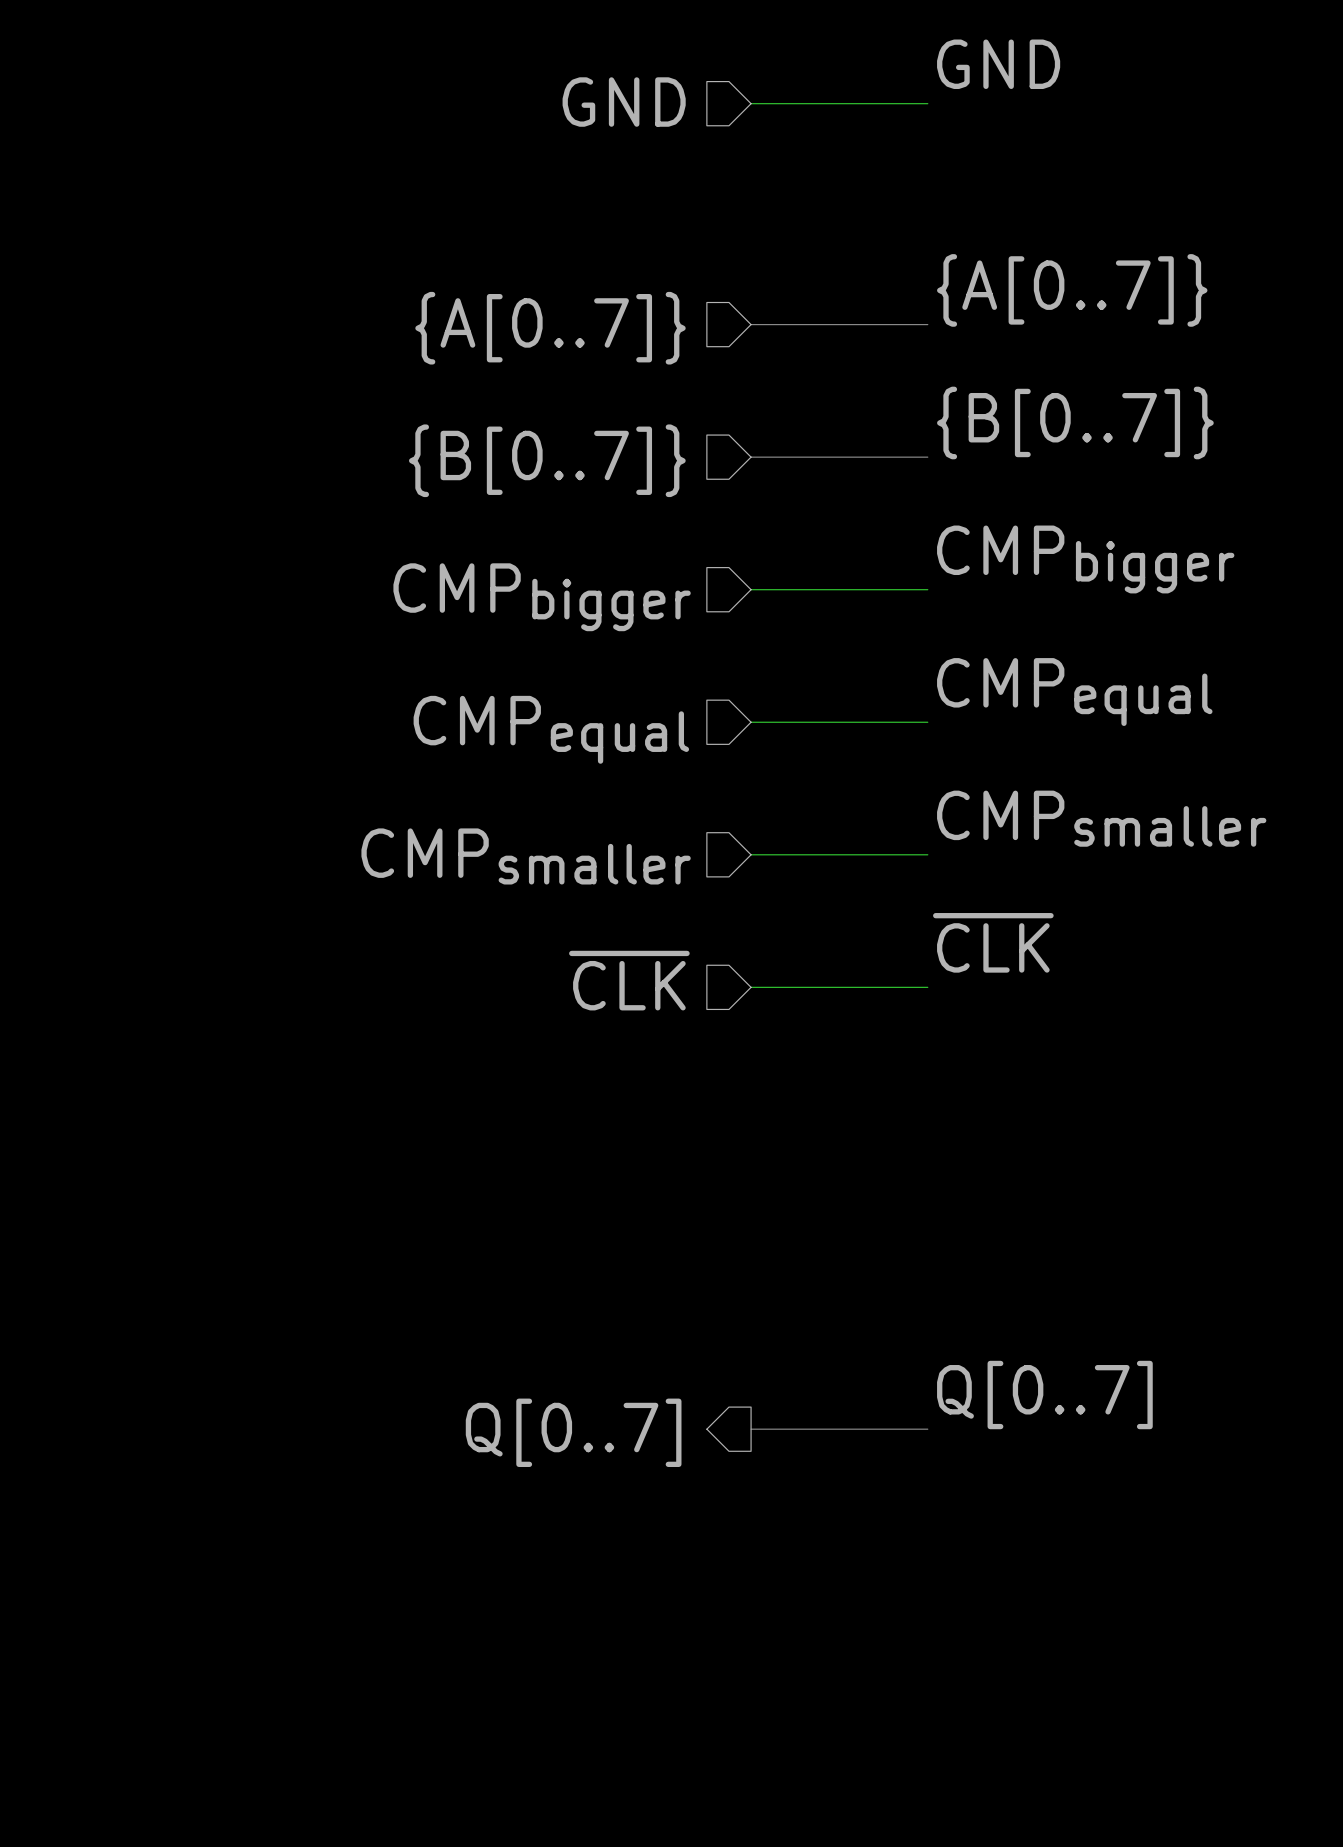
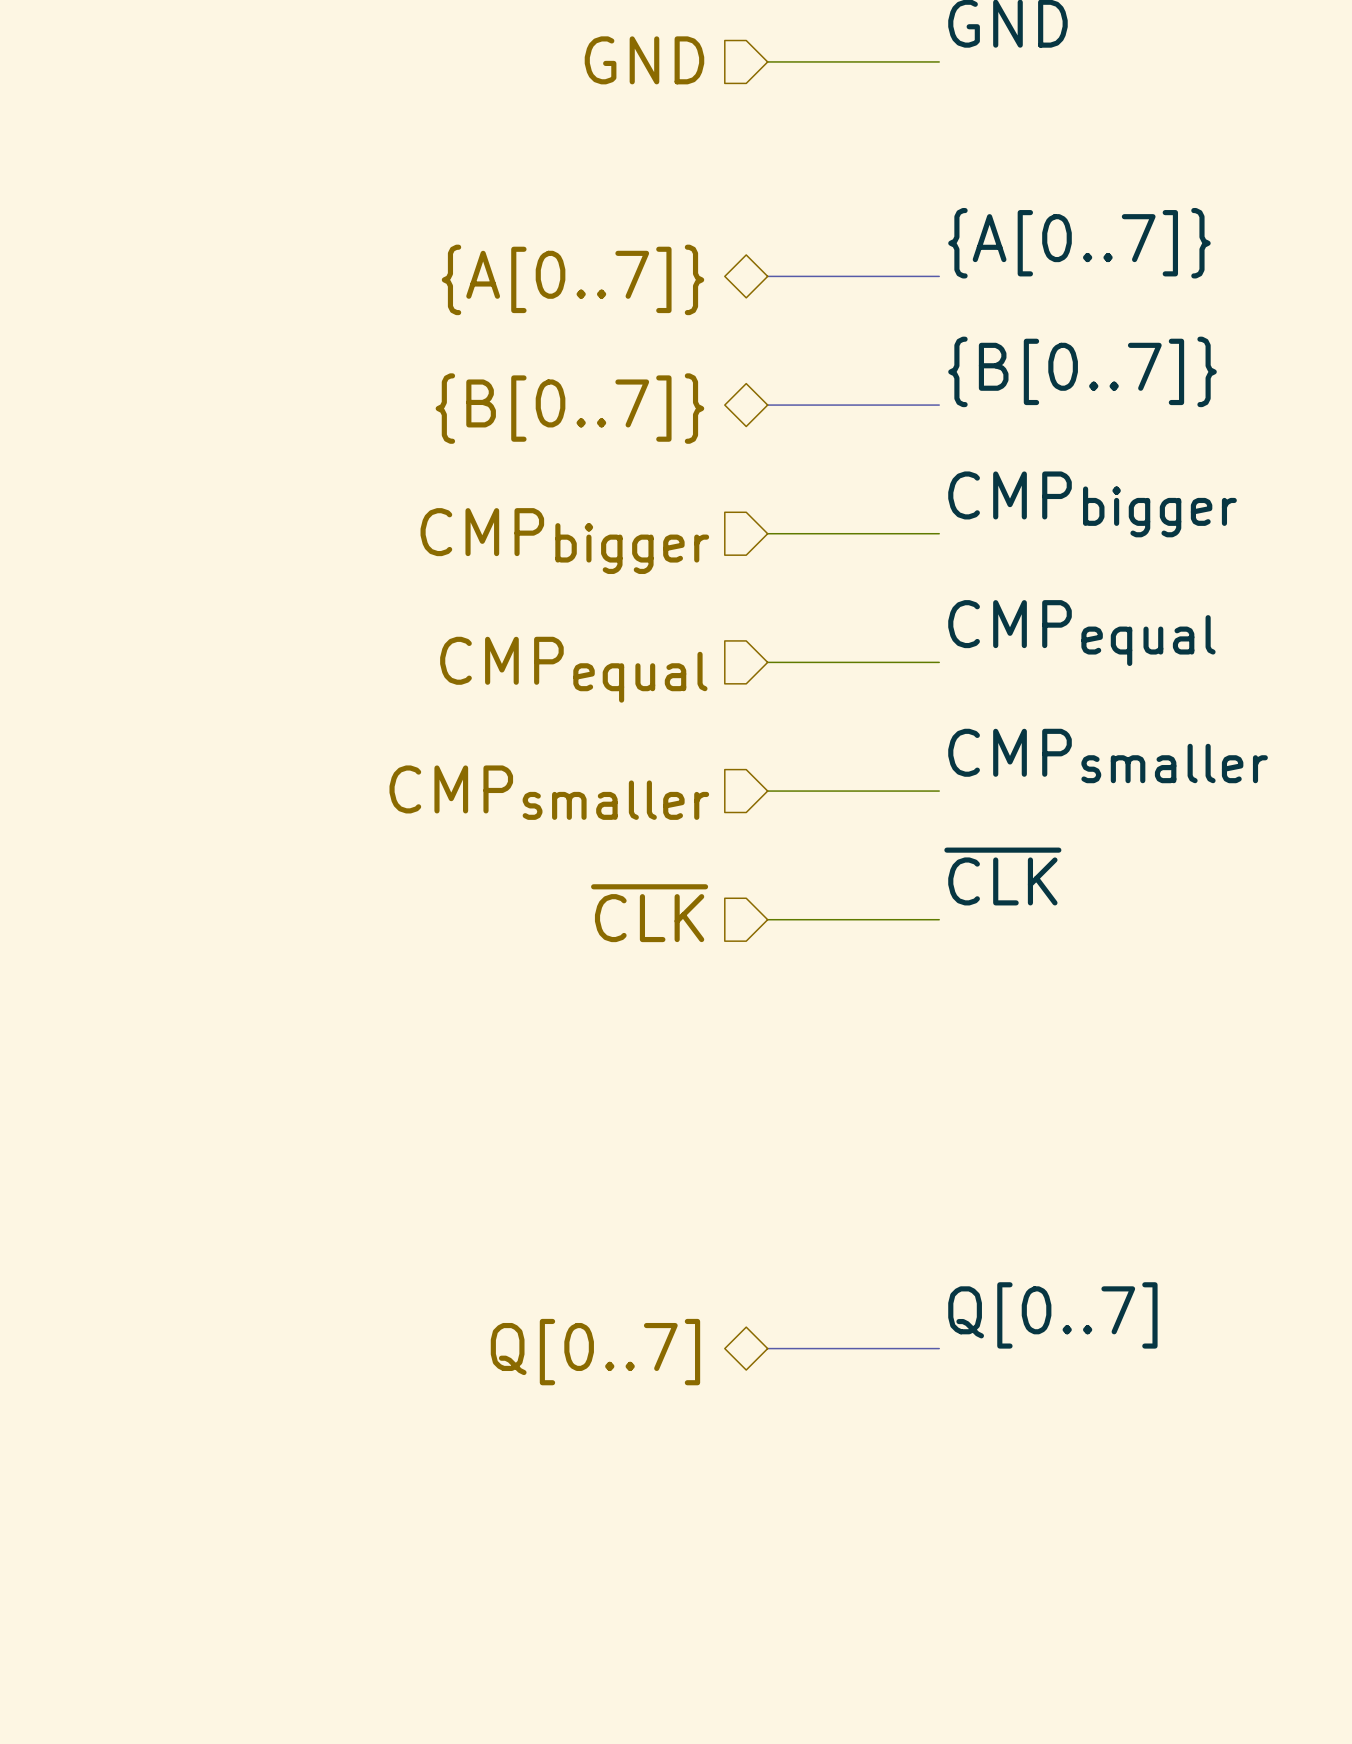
hierarchical label shape: input (550, 328) -> bidirectional (573, 279)
hierarchical label shape: input (547, 460) -> bidirectional (569, 408)
hierarchical label shape: output (573, 1432) -> bidirectional (595, 1352)

